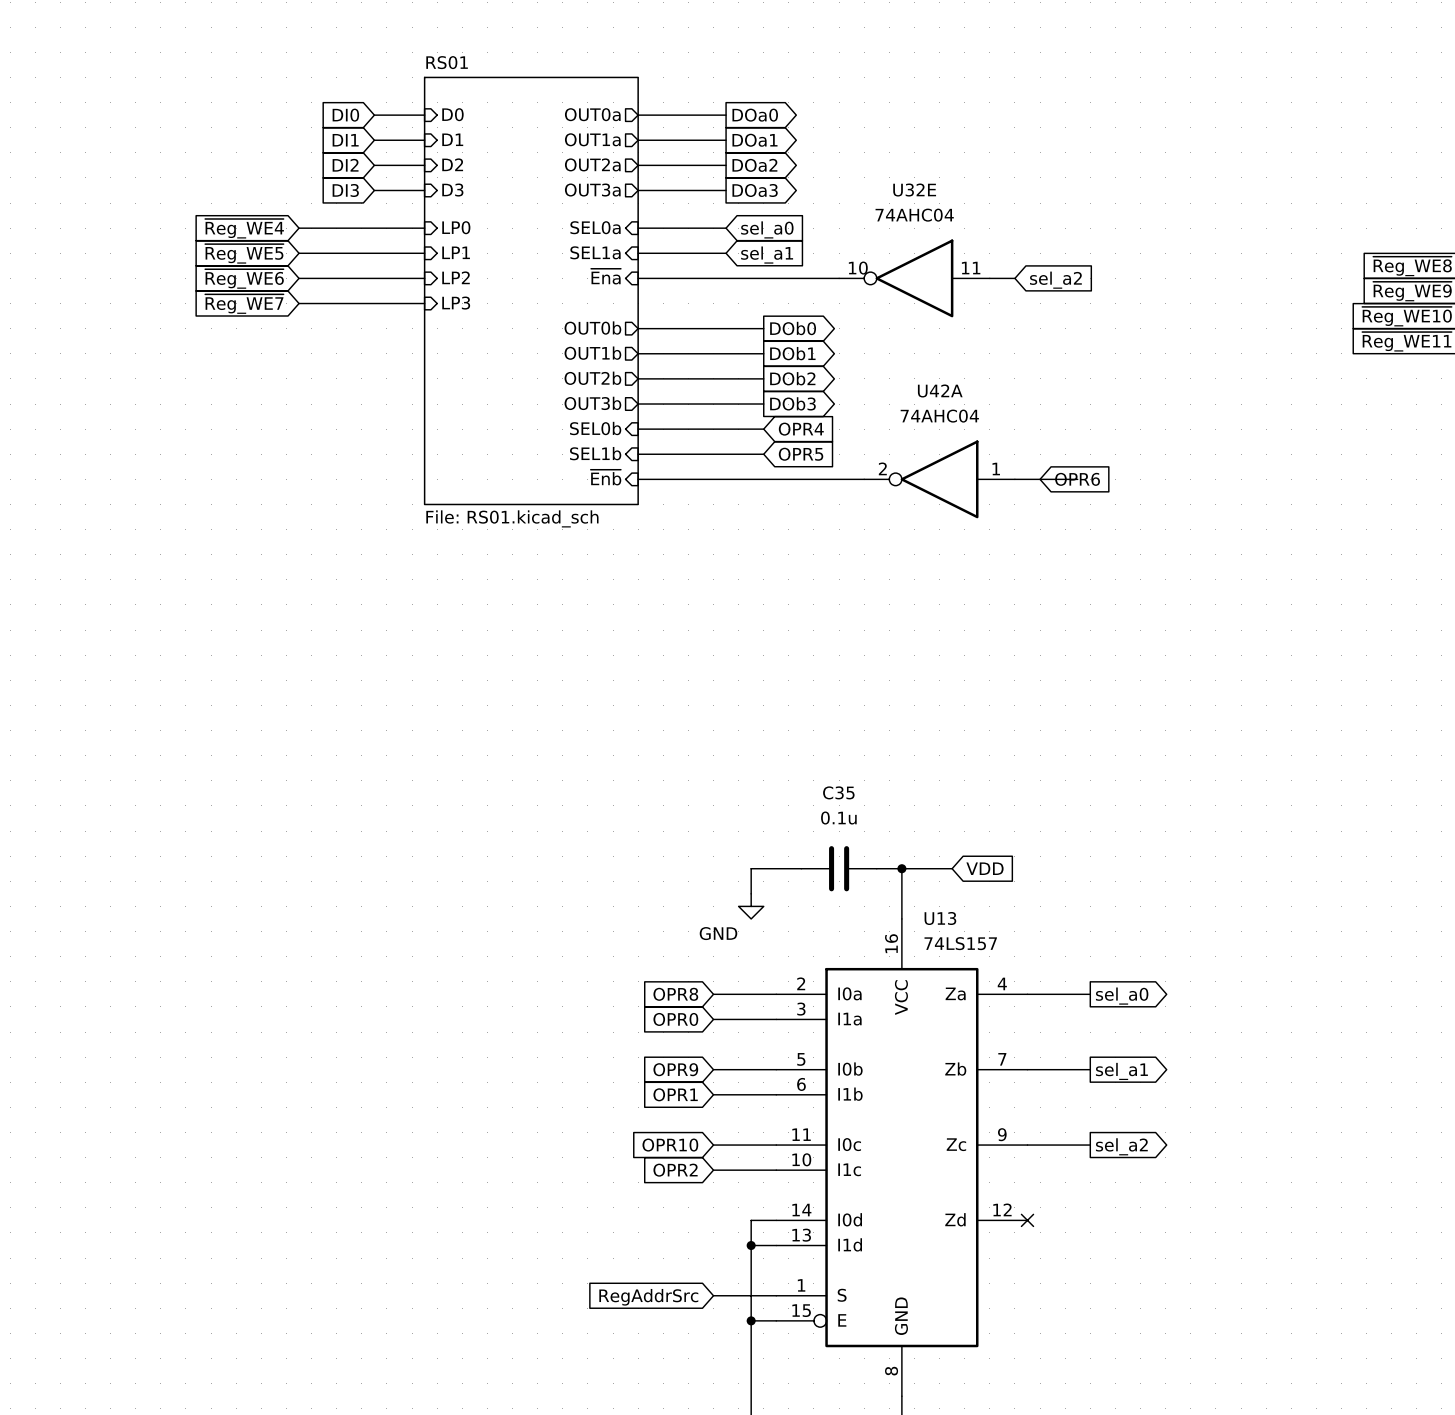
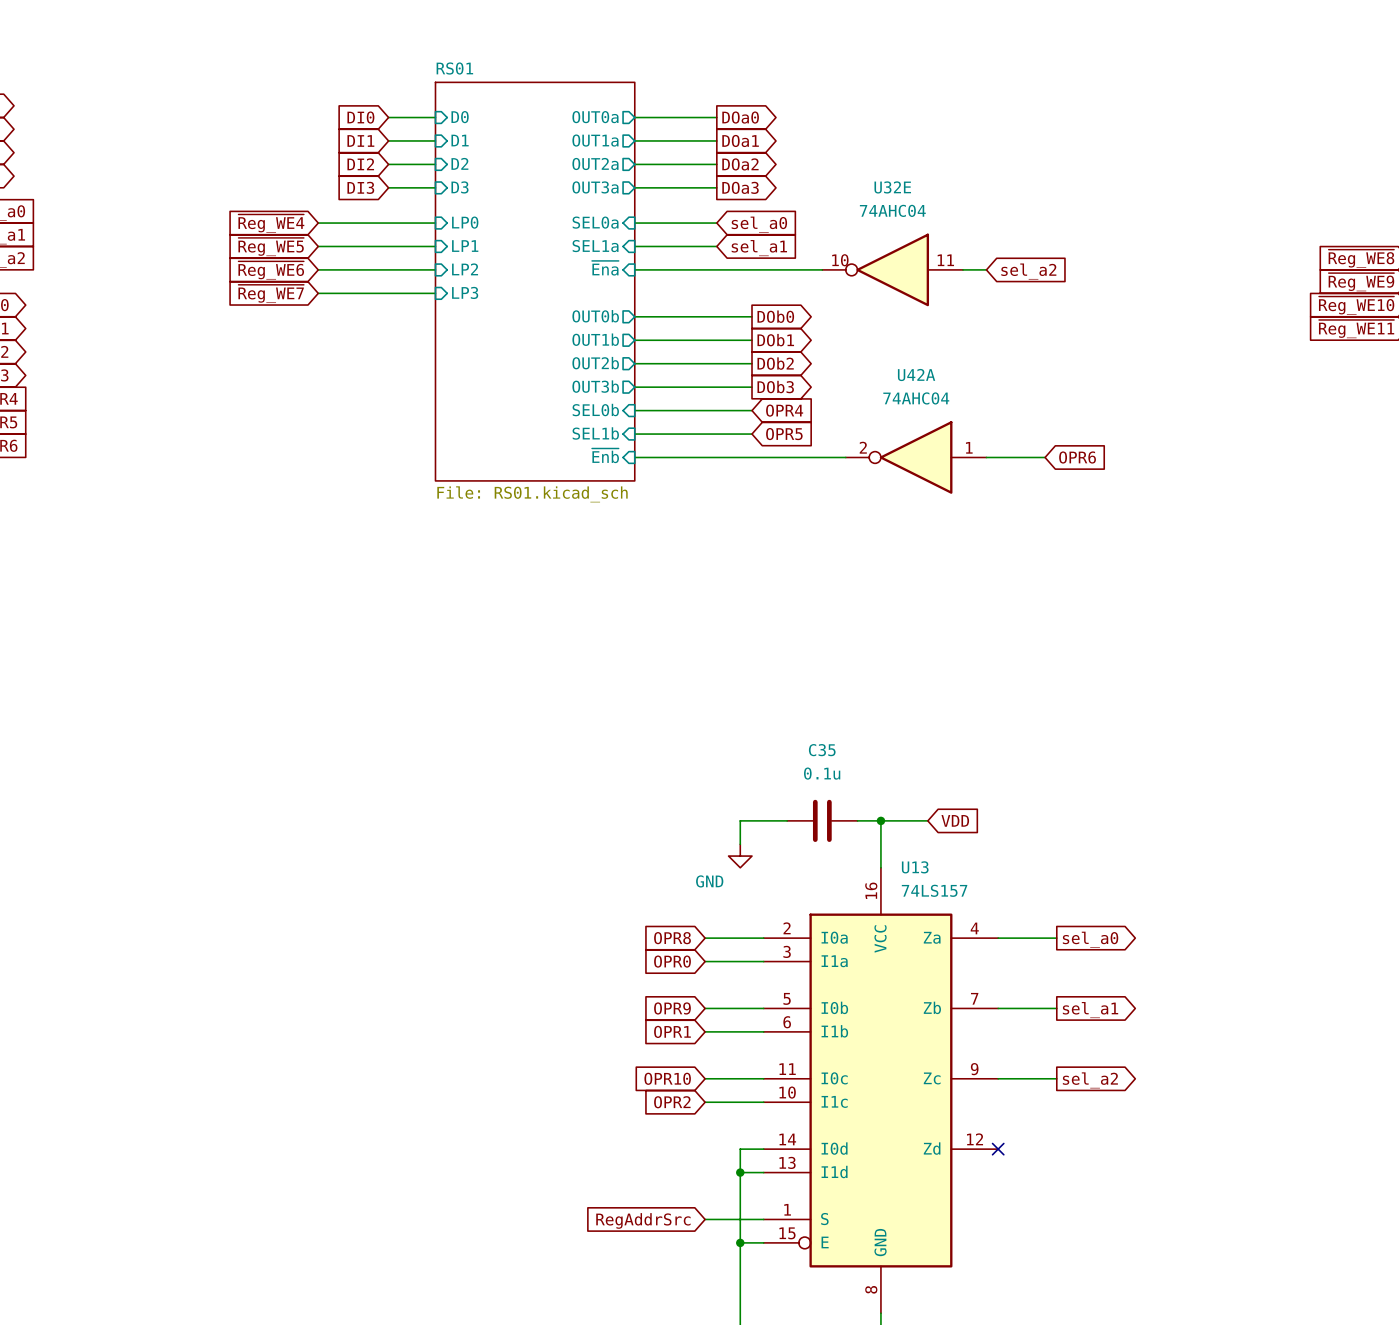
global label position: OPR6 (1077, 479) -> OPR6 (1077, 457)

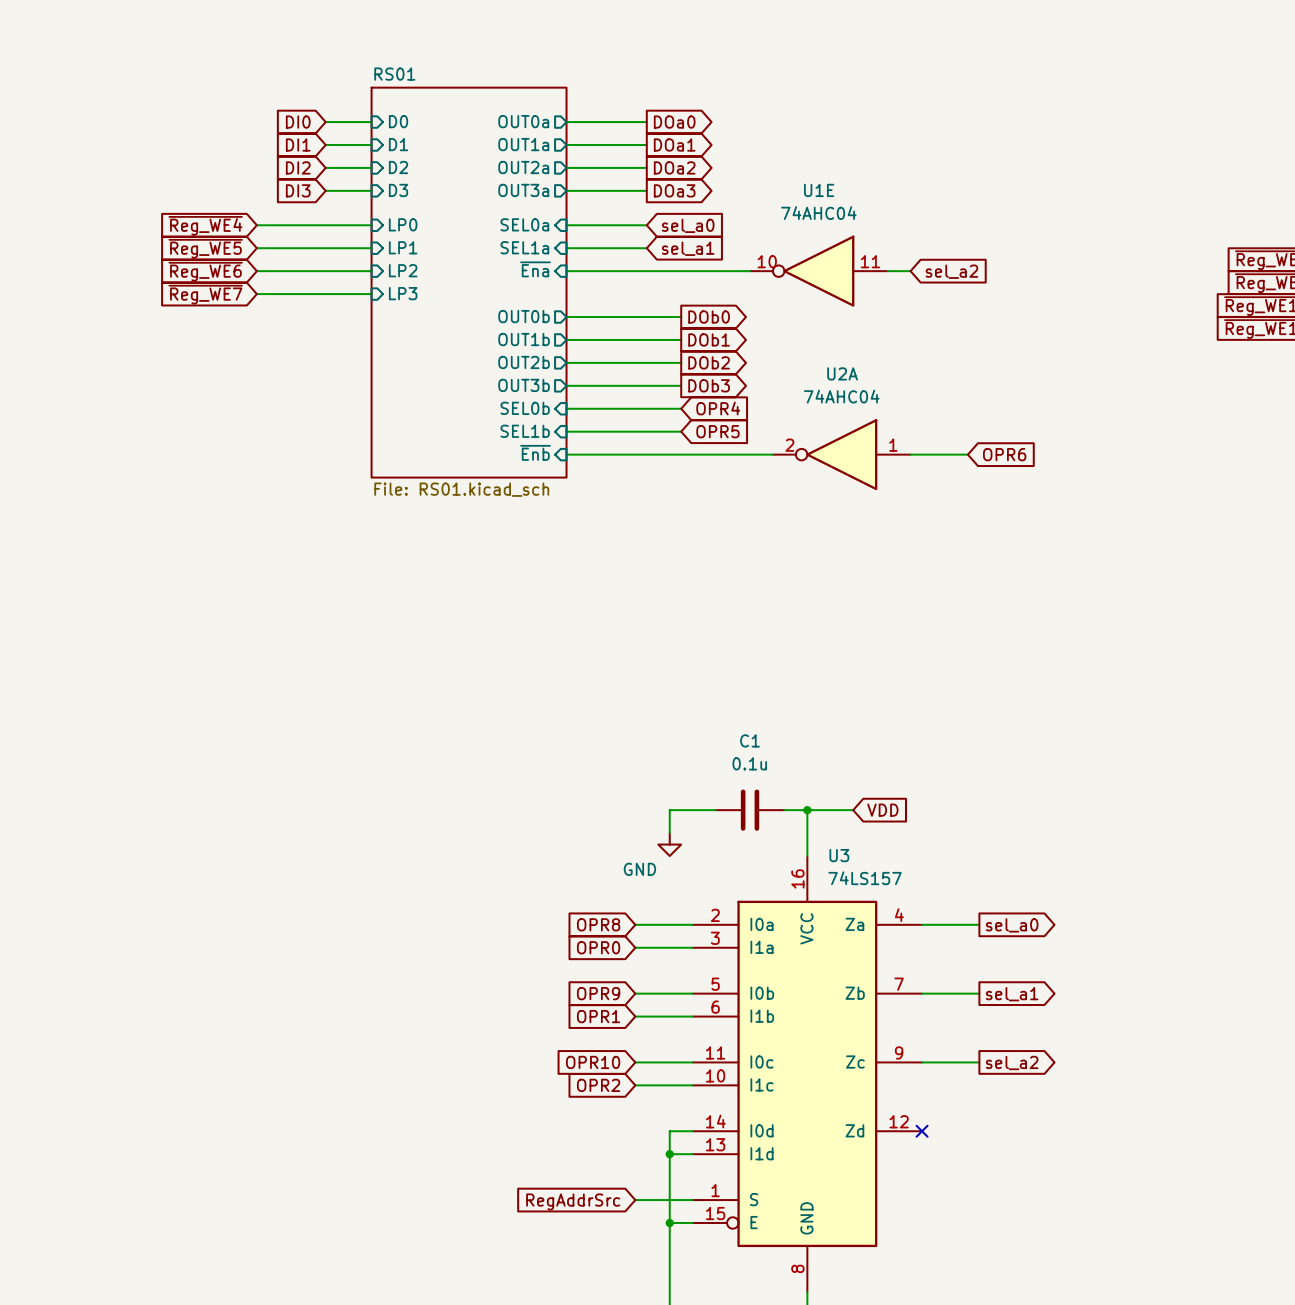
U32E name: U32E (892, 187) -> U1E (819, 190)
U42A name: U42A (916, 375) -> U2A (842, 373)
C35 name: C35 (822, 750) -> C1 (750, 740)
U13 name: U13 (915, 867) -> U3 (839, 855)

